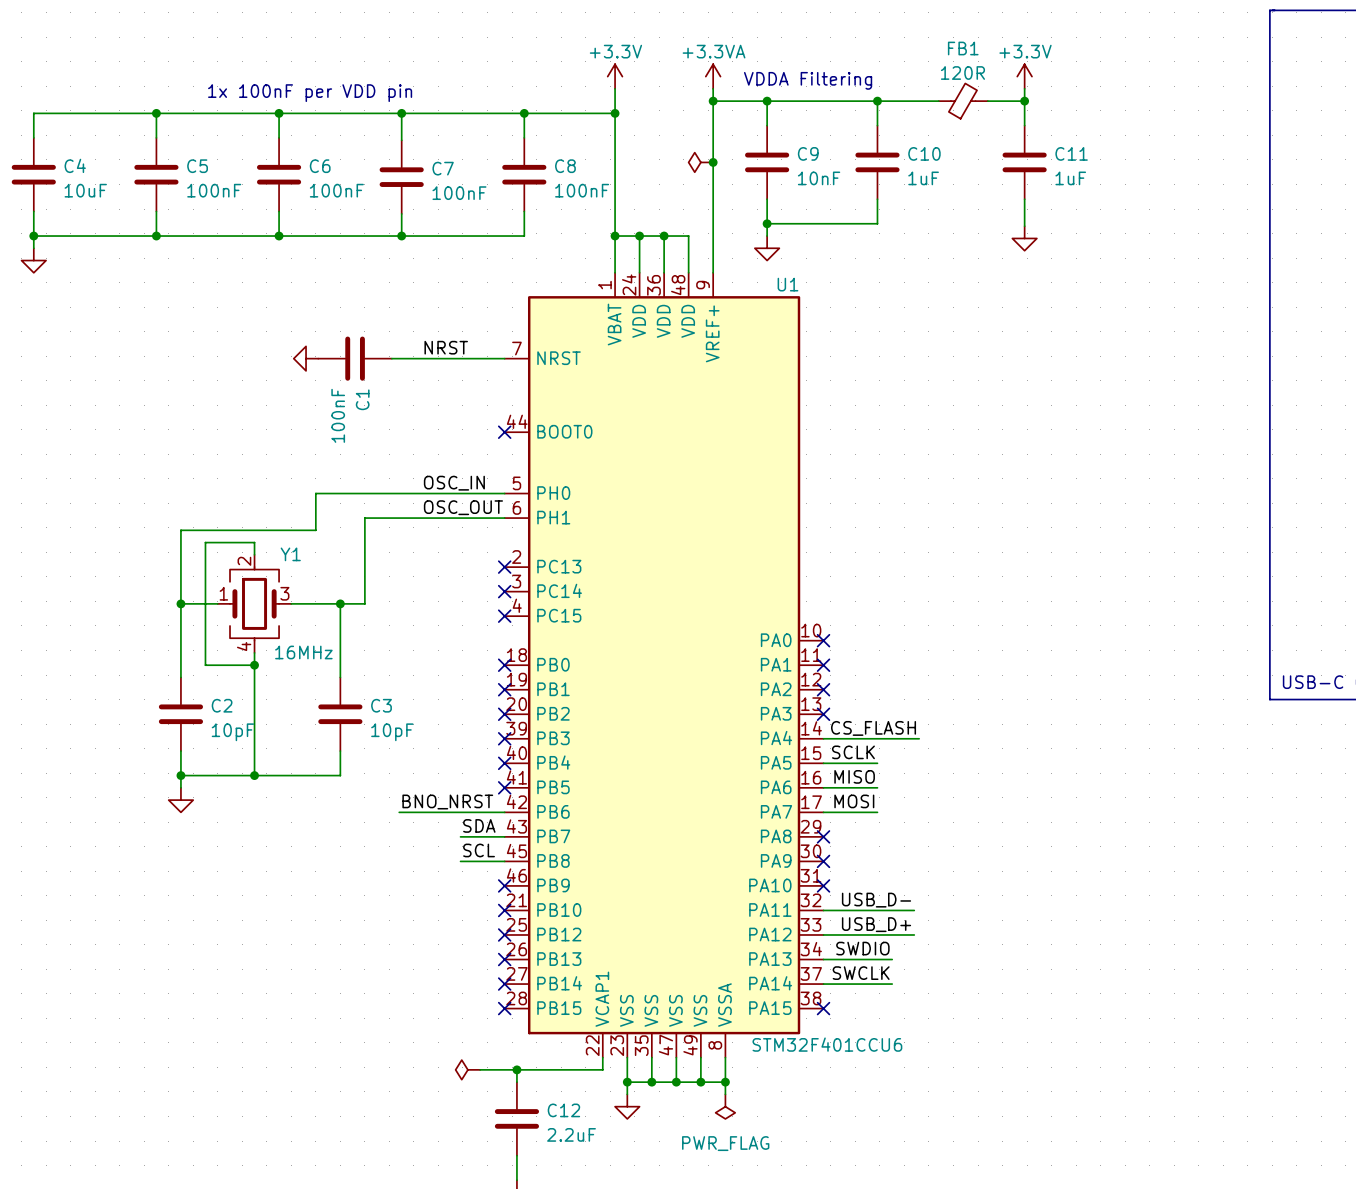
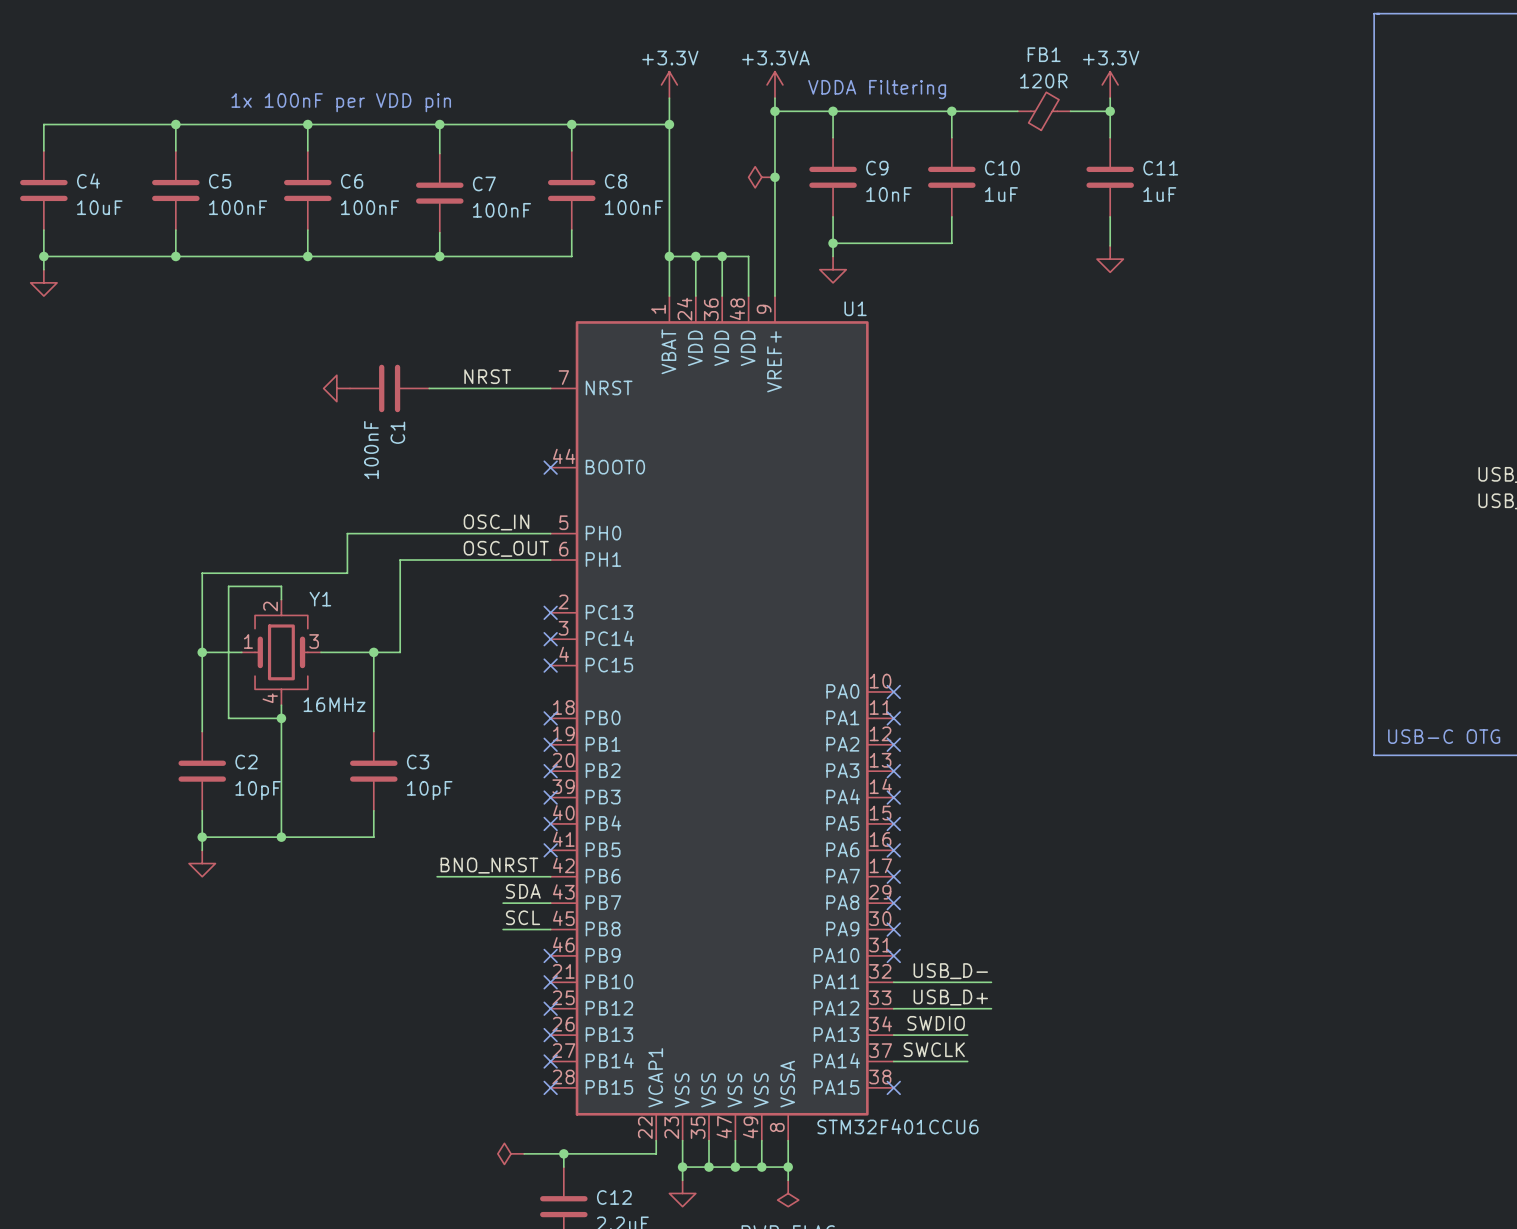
label: CS_FLASH (873, 728) -> none
wire: (823, 738) (919, 738) -> none
no-connect mark: none -> (893, 797)
label: SCLK (853, 752) -> none
wire: (823, 763) (877, 763) -> none
no-connect mark: none -> (893, 823)
label: MISO (854, 776) -> none
wire: (823, 787) (877, 787) -> none
no-connect mark: none -> (893, 850)
label: MOSI (854, 801) -> none
wire: (823, 812) (877, 812) -> none
no-connect mark: none -> (893, 876)

